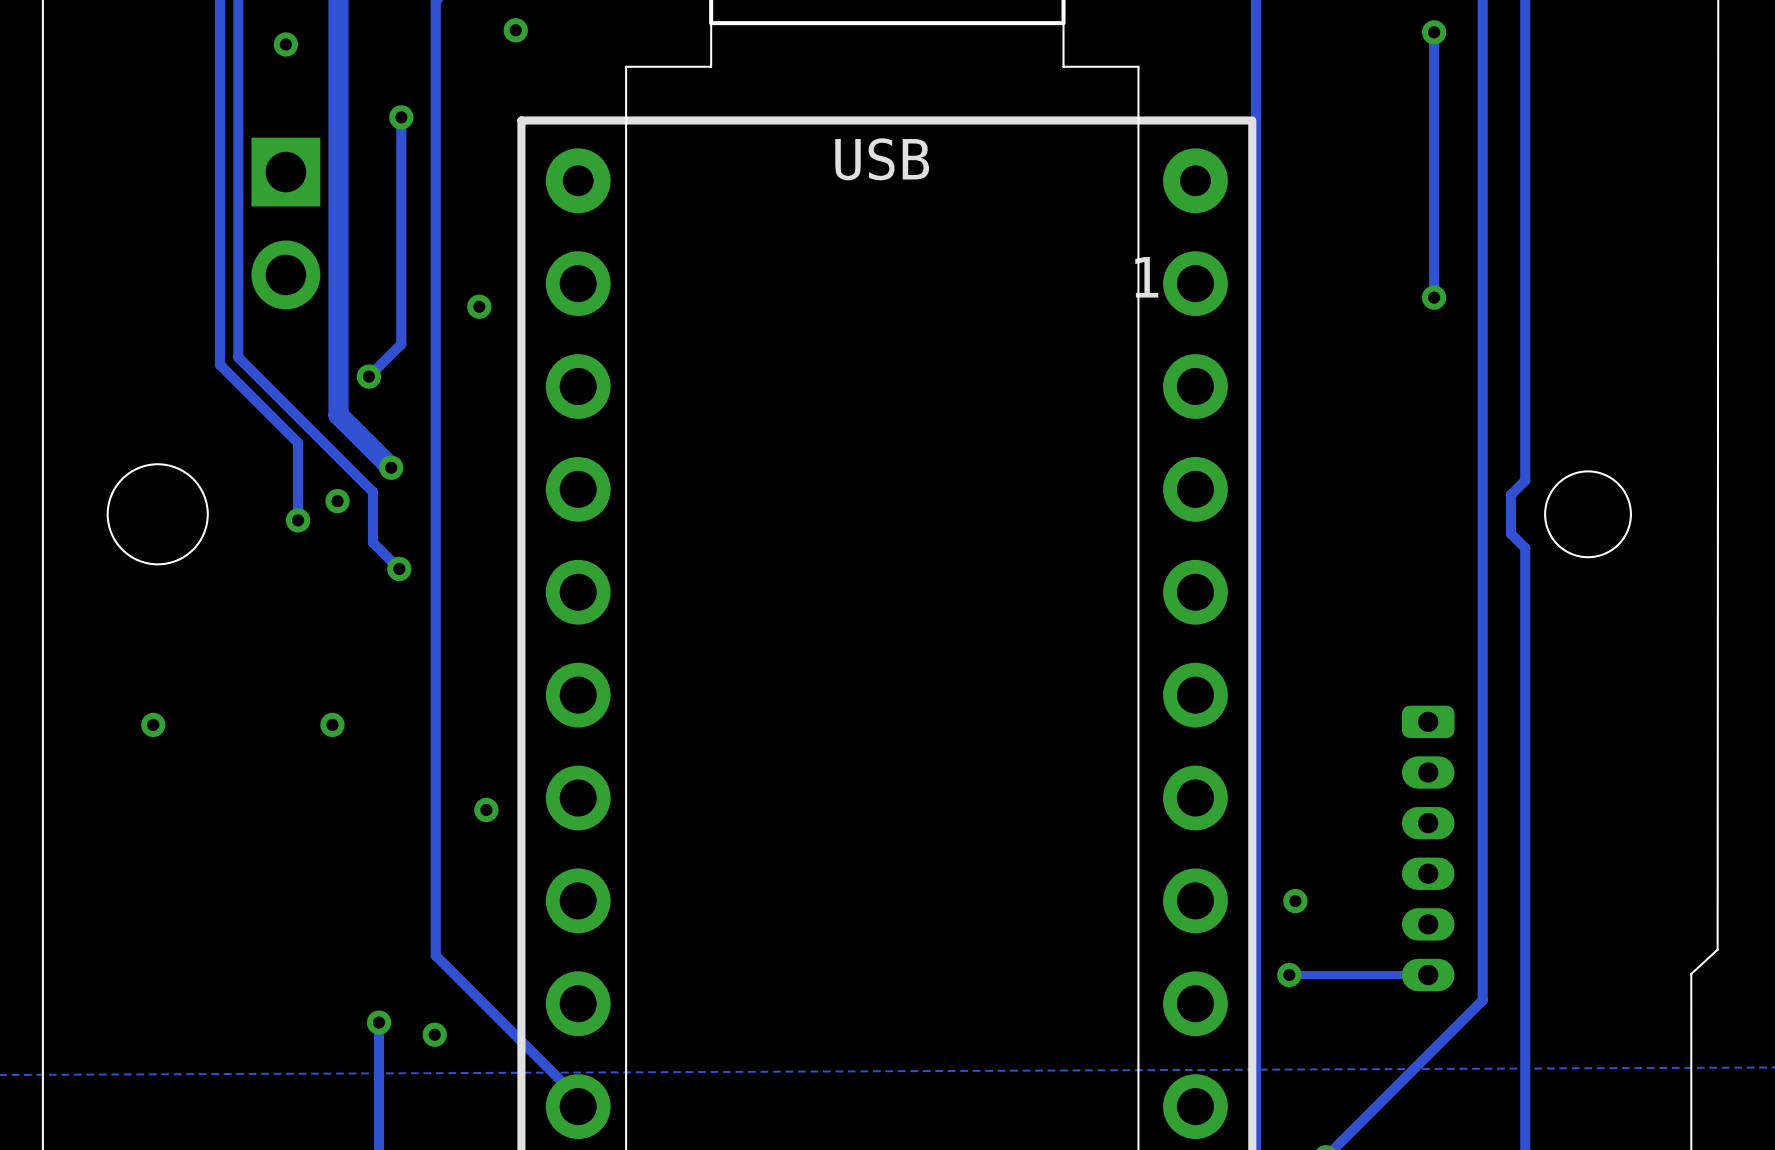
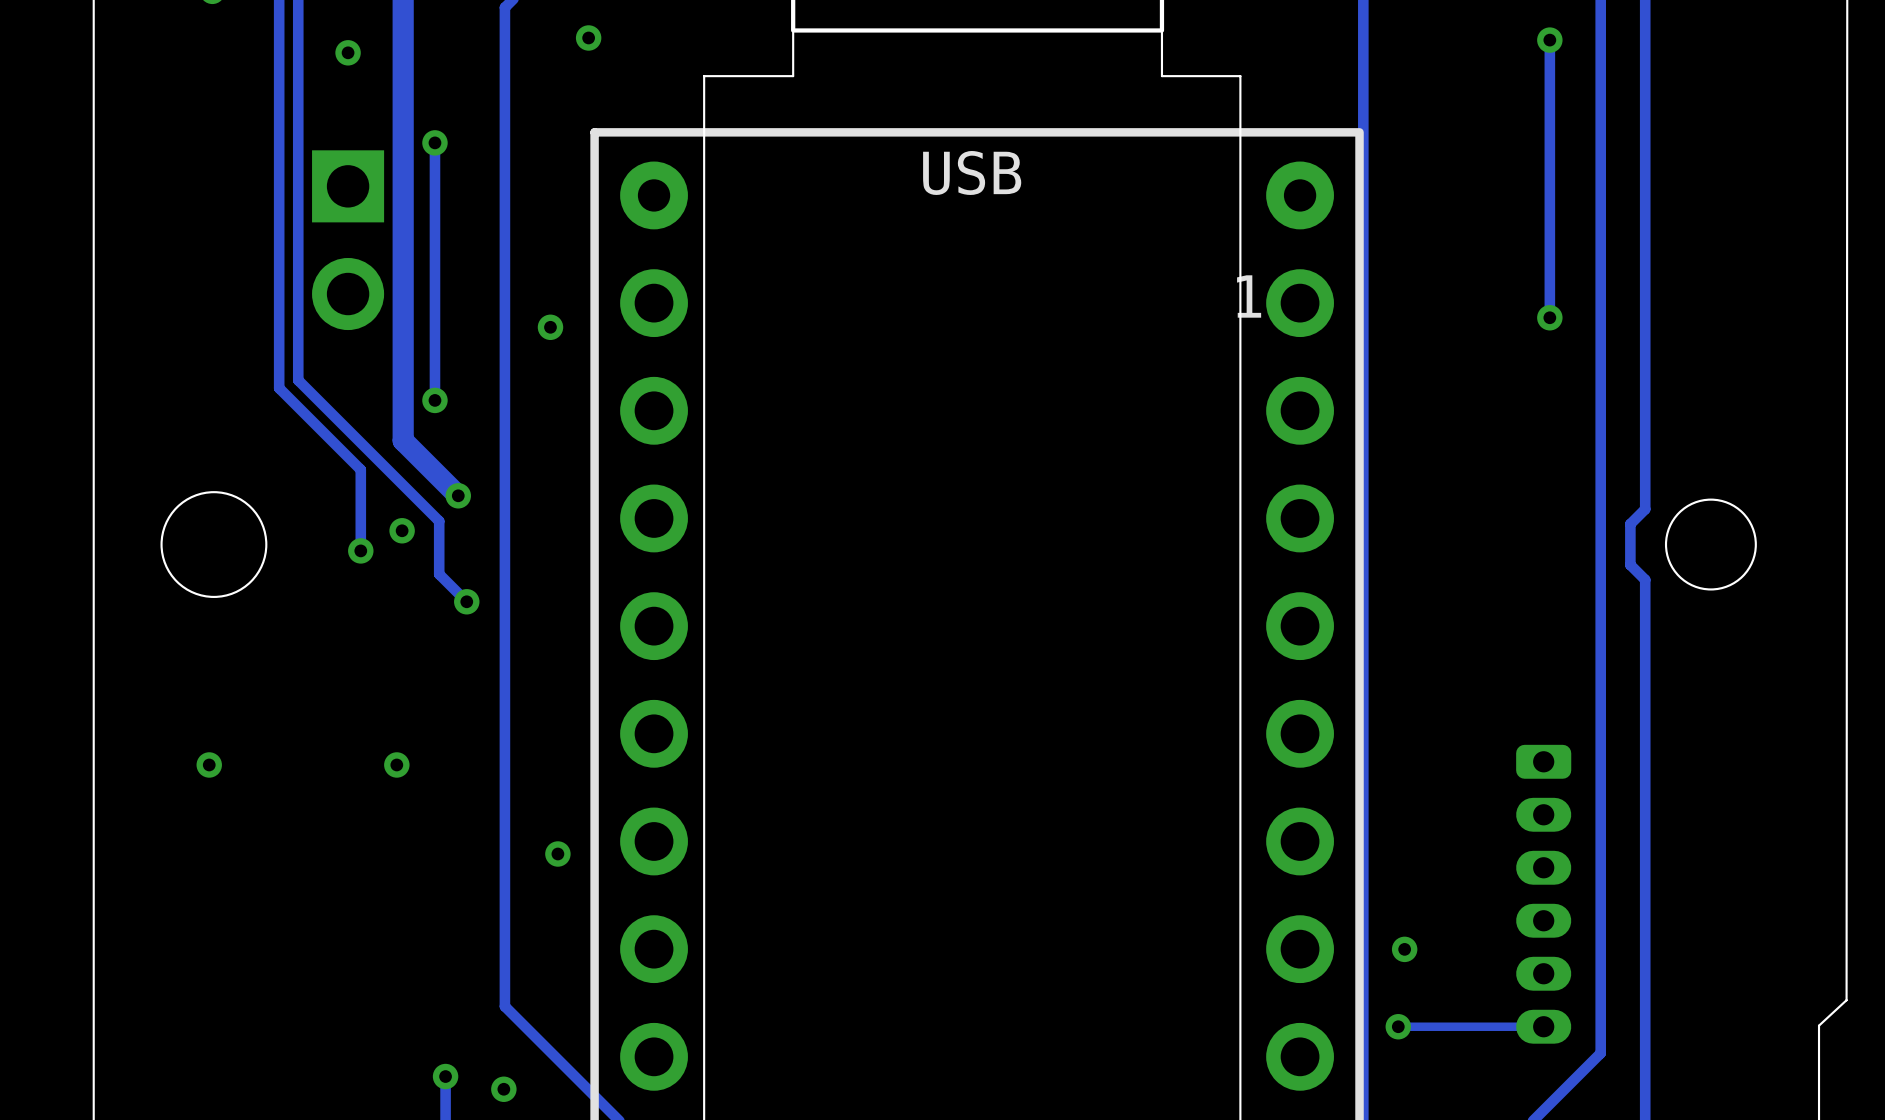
track: (401, 117) (401, 344) (368, 376) -> (434, 142) (434, 400)
via position: (401, 117) -> (434, 142)

